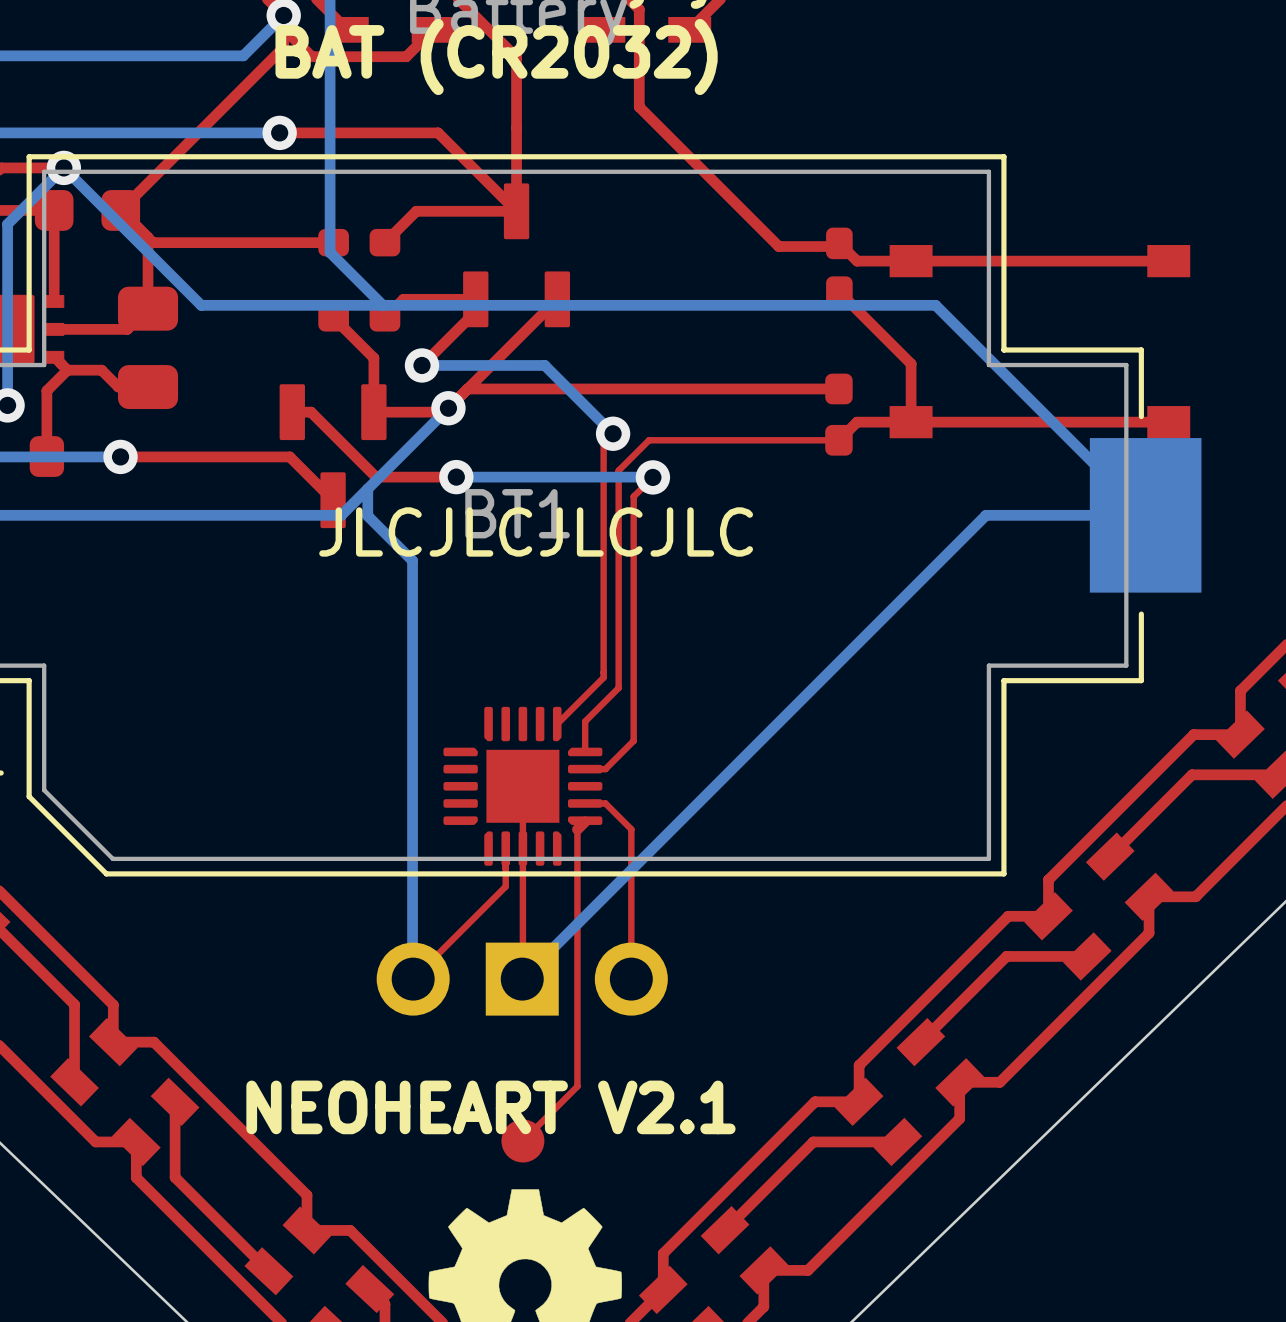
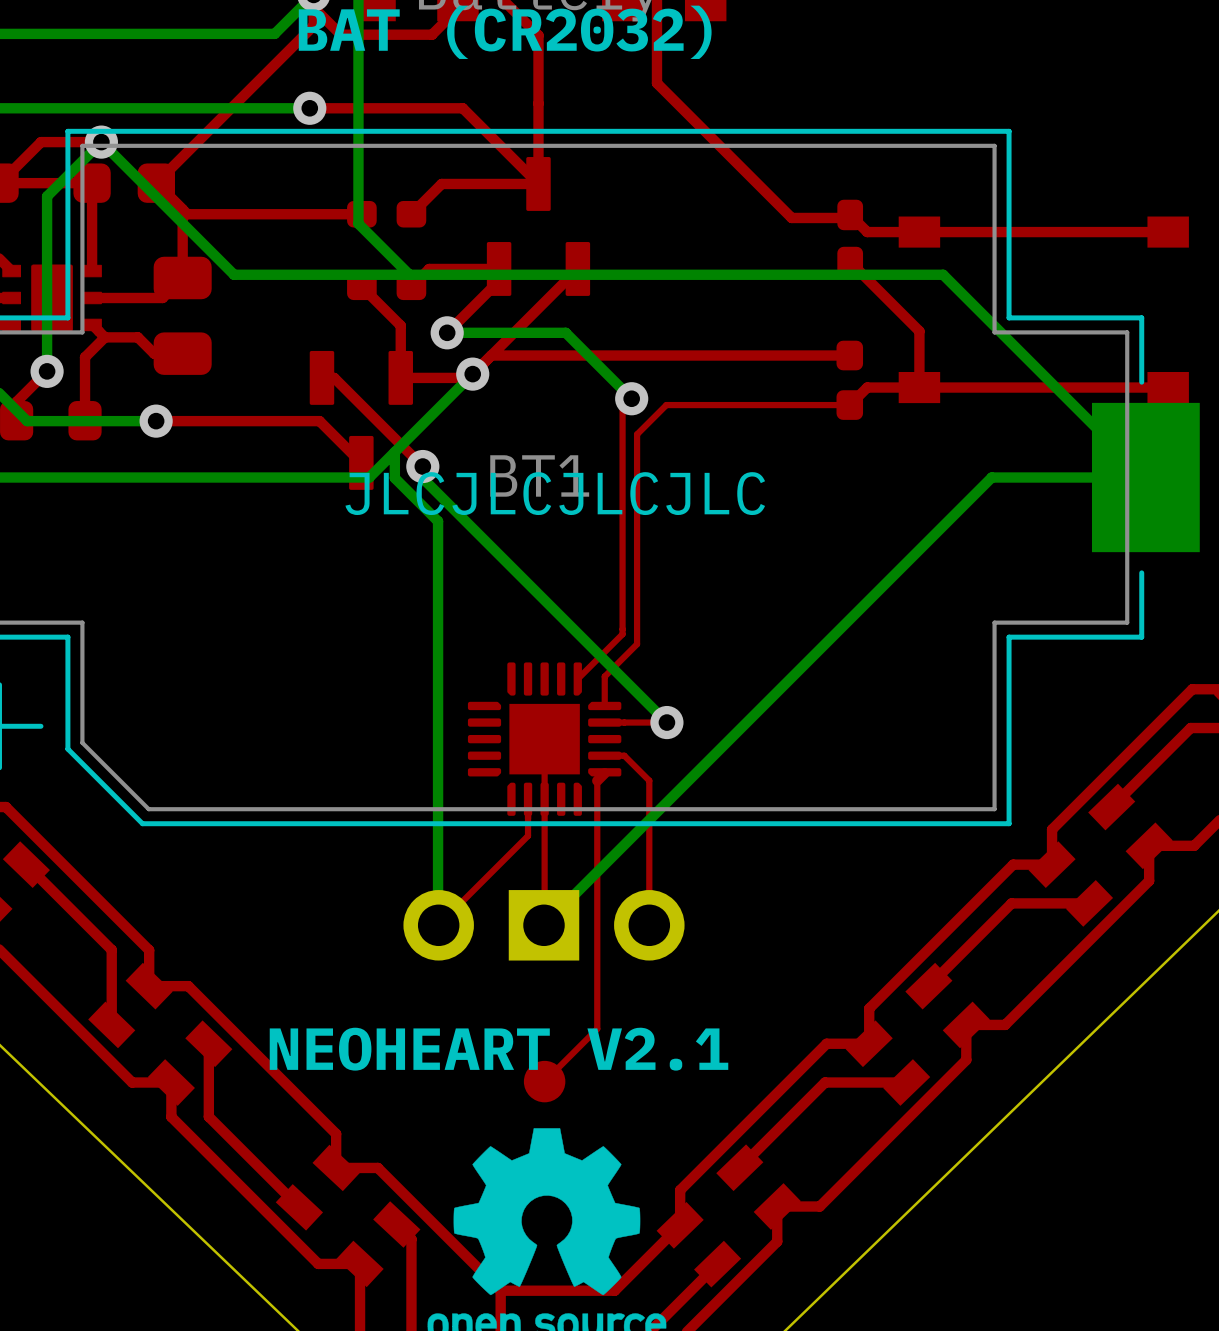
top track: (304, 412) (311, 412) (376, 477) (456, 477) -> (334, 377) (419, 463)
via position: (456, 477) -> (422, 466)
top track: (652, 477) (633, 496) (633, 740) (605, 769) -> (666, 722) (624, 722)
bottom track: (652, 477) (456, 477) -> none
via: (652, 477) -> none
bottom track: none -> (422, 466) (422, 478) (666, 722)
via: none -> (666, 722)

